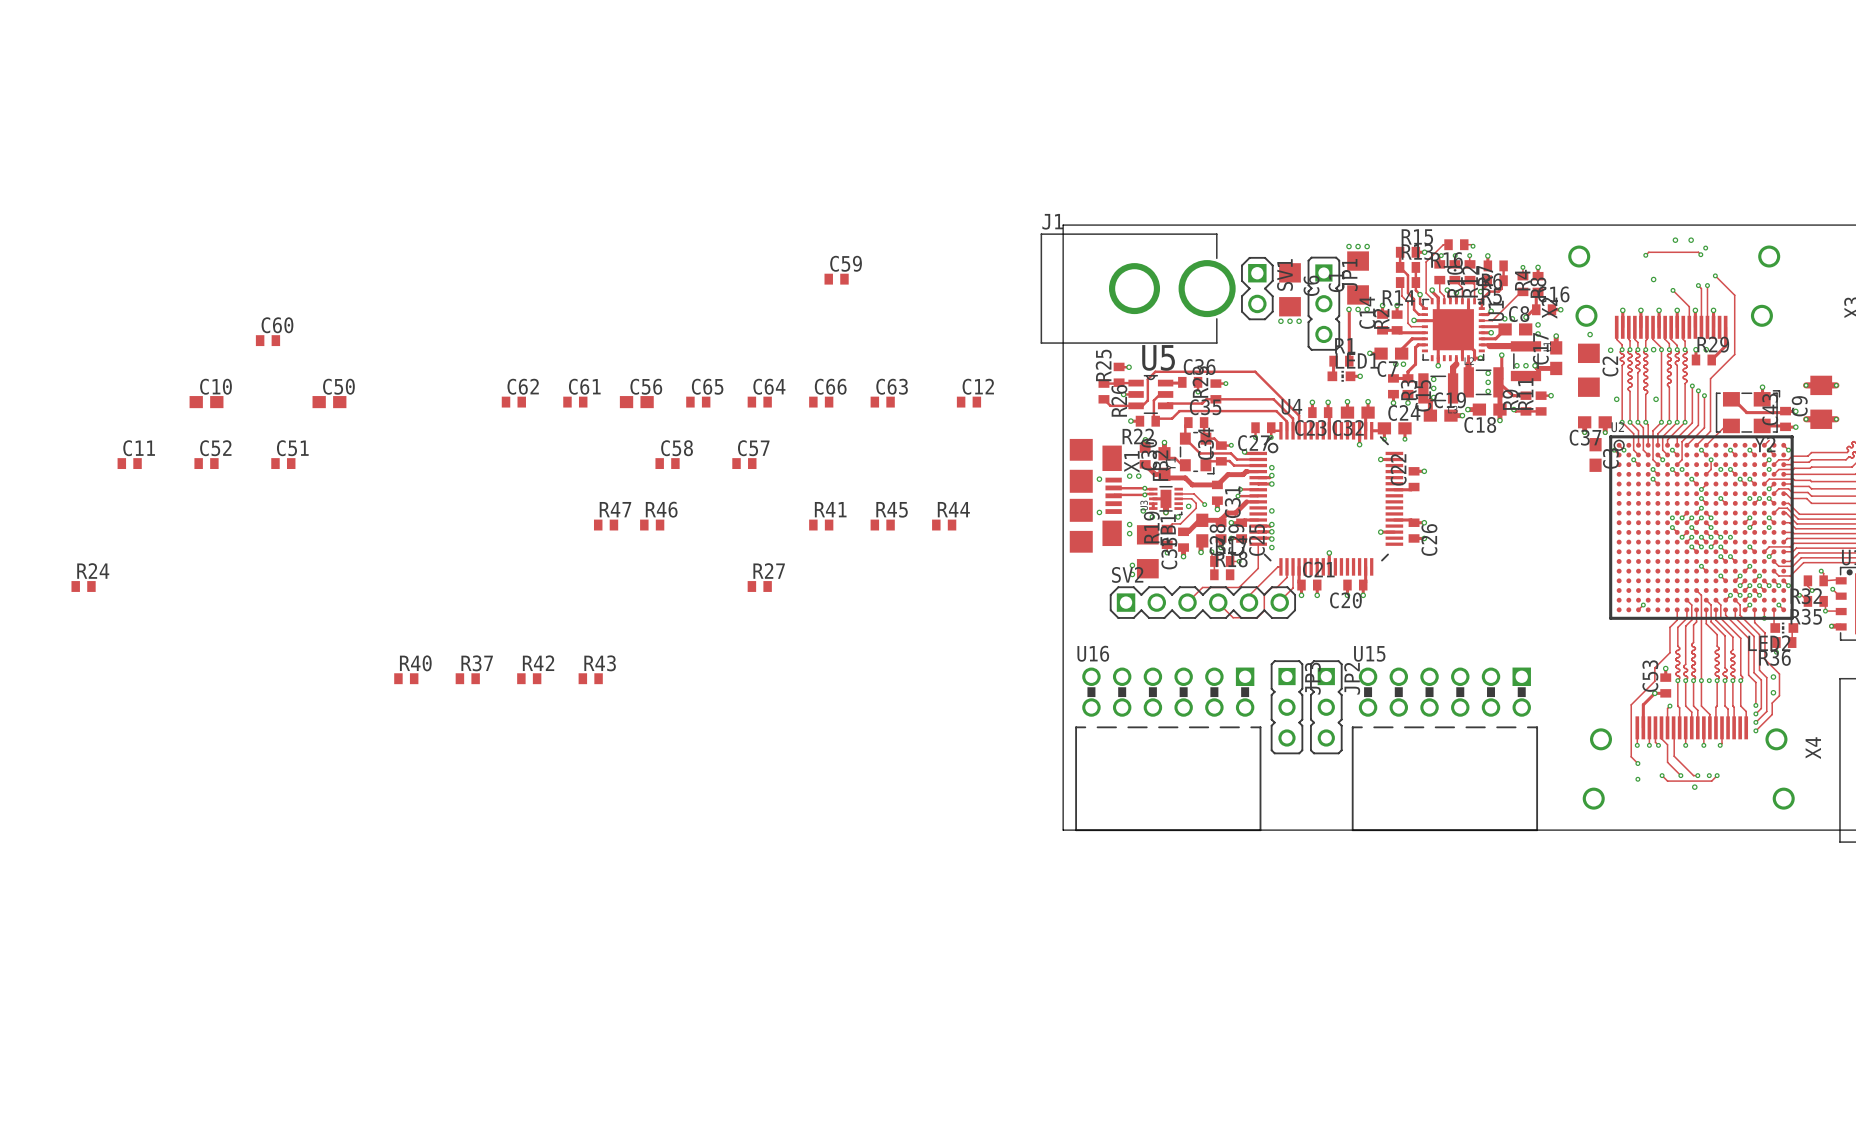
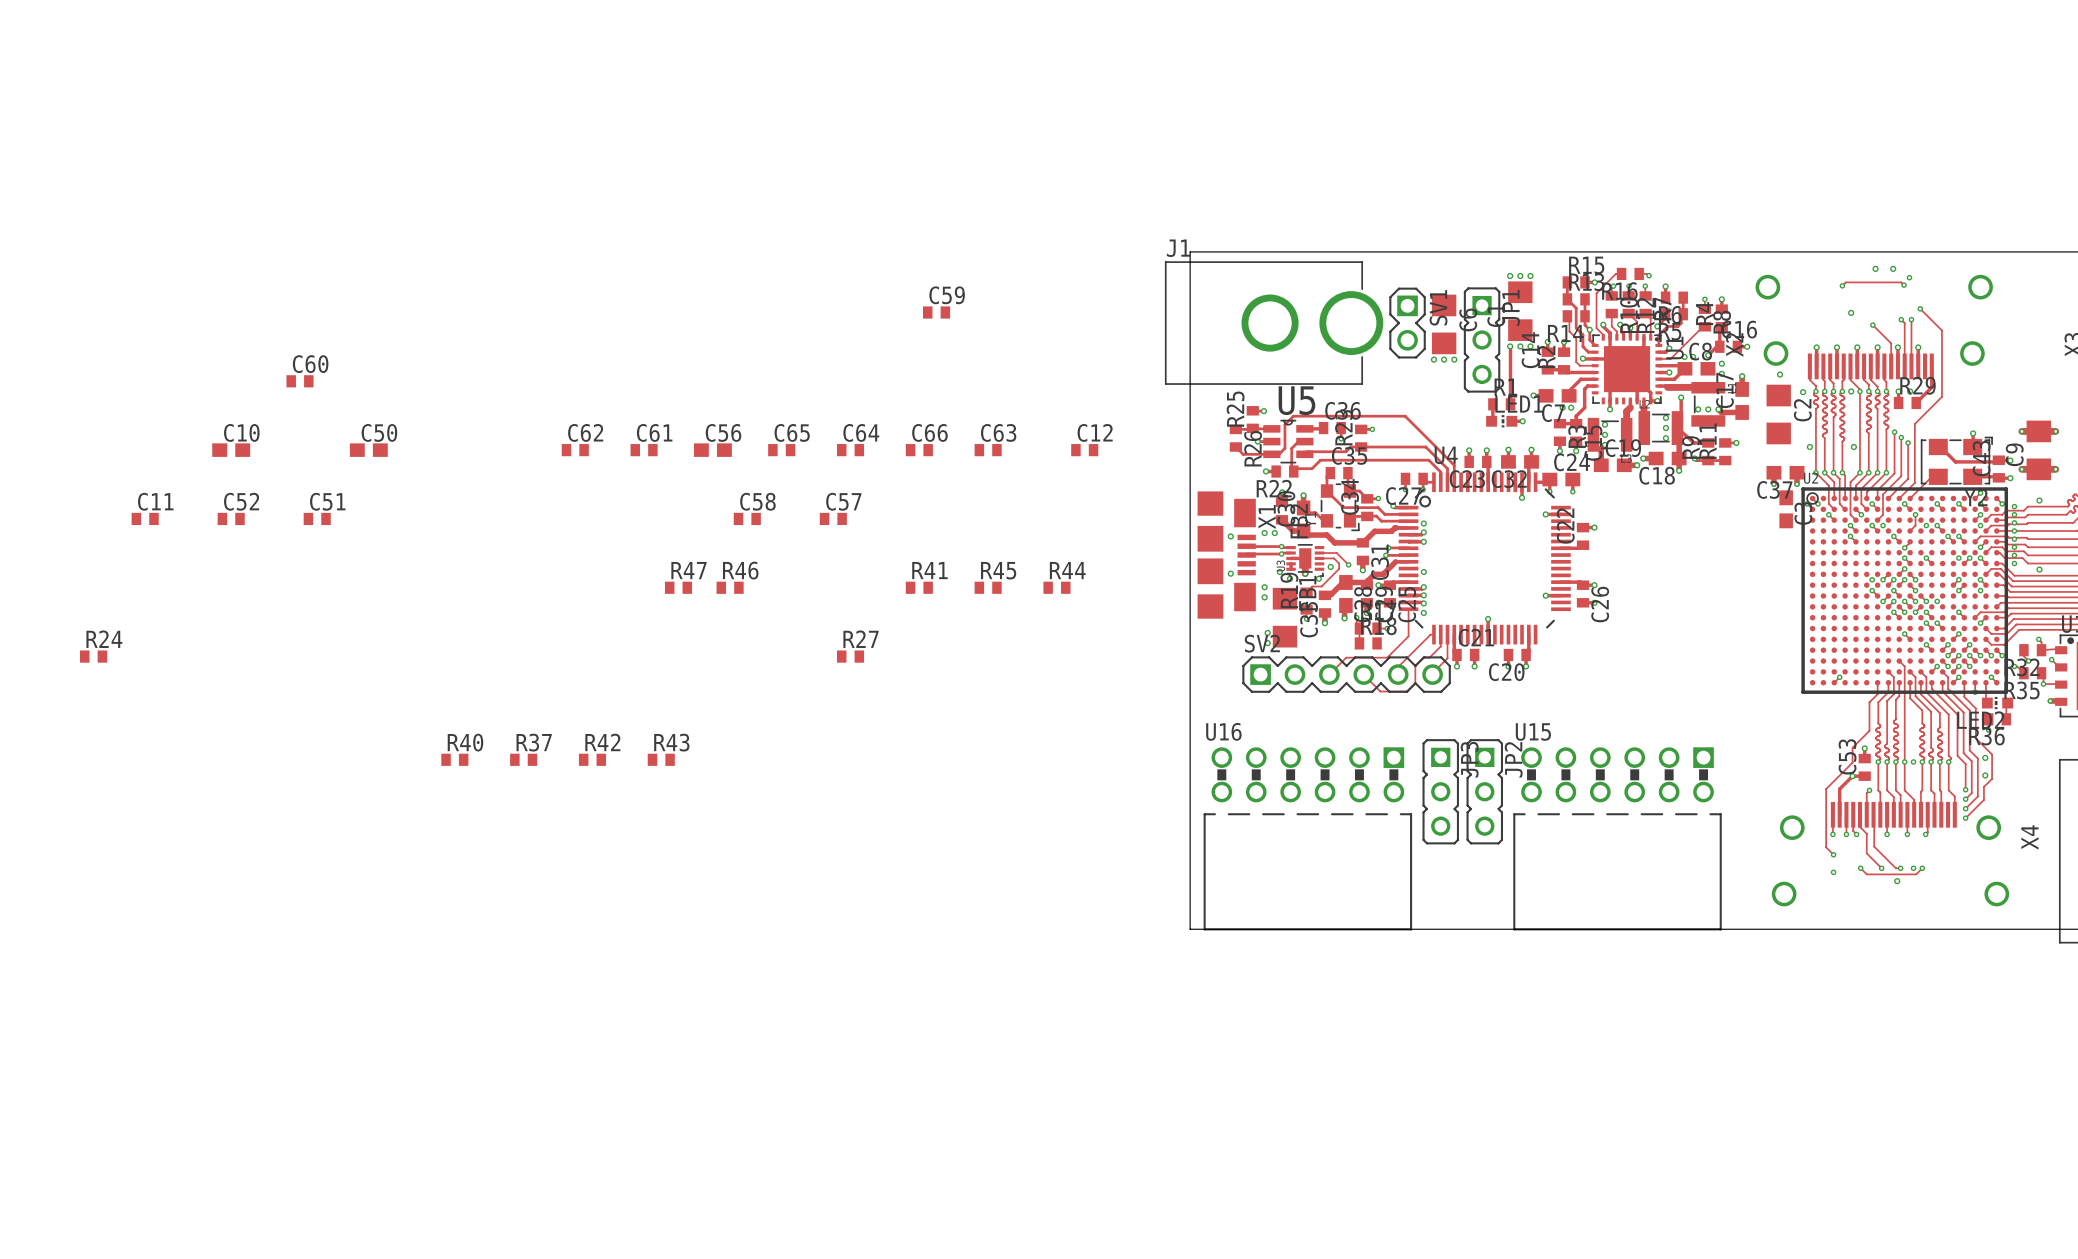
via: none -> (1980, 493)
via: none -> (2039, 500)
via: none -> (2014, 506)
via: none -> (2014, 514)
via: none -> (2014, 522)
via: none -> (2014, 531)
via: none -> (2014, 539)
via: none -> (2014, 547)
via: none -> (2014, 555)
via: none -> (2014, 563)
via: none -> (2039, 569)

